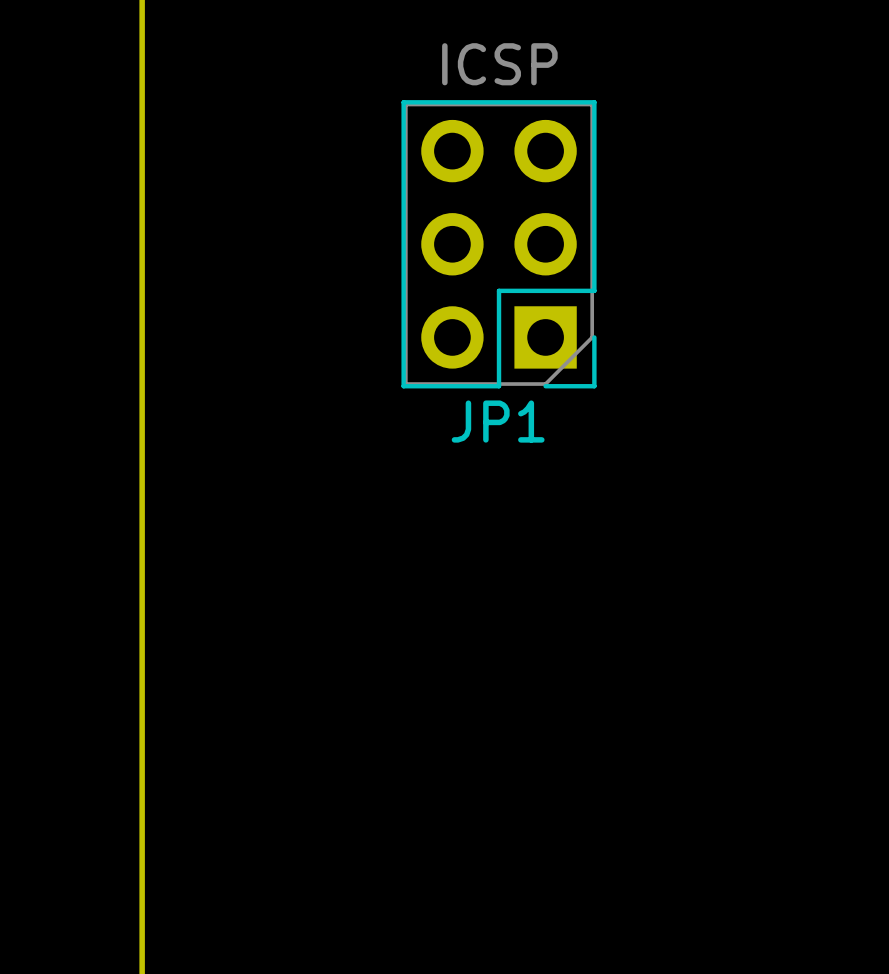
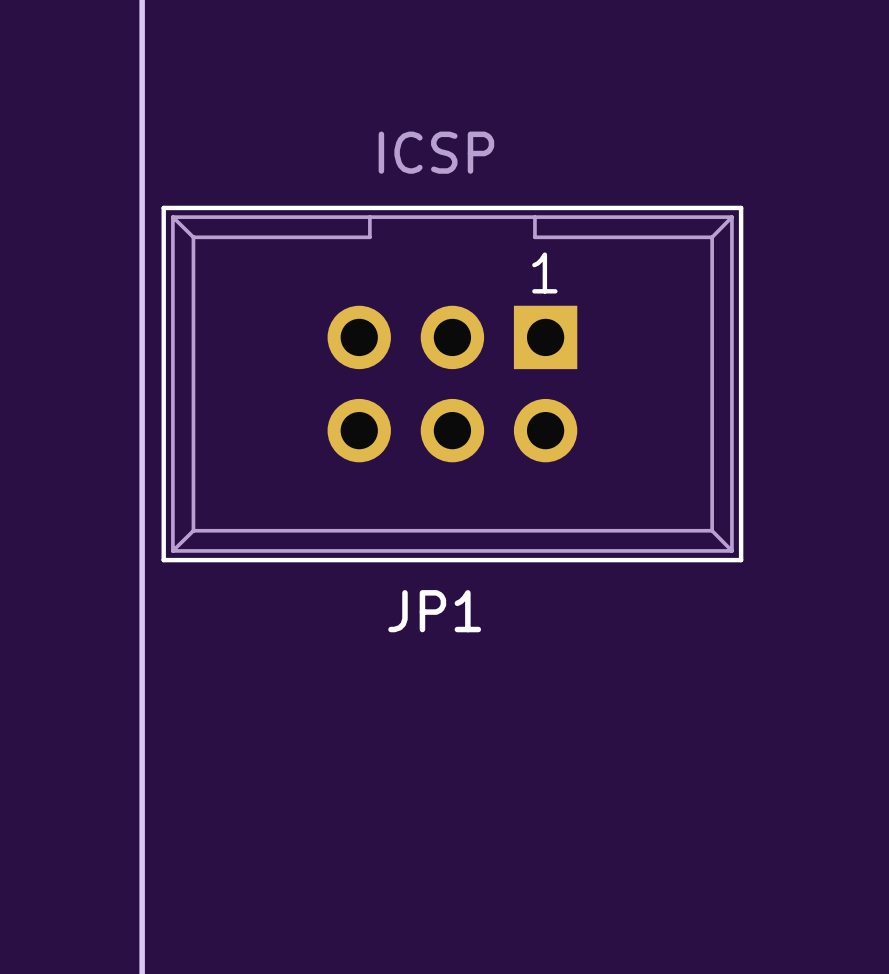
JP1 footprint: [401, 100, 597, 389] -> [161, 205, 744, 563]

